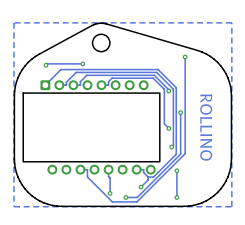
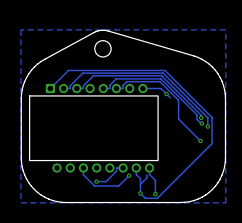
track: (185, 56) (185, 153) (136, 201) (112, 201) (87, 177) (87, 169) (80, 169) -> (129, 175) (118, 185) (94, 185) (83, 174) (83, 167)
via: (185, 56) -> none
track: (82, 63) (46, 65) -> none
via: (82, 63) -> none
via: (46, 65) -> none
track: (60, 69) (158, 69) (176, 87) (176, 154) (153, 177) (148, 177) (143, 172) (143, 169) (136, 169) -> (65, 73) (68, 70) (164, 70) (212, 117) (212, 143) (157, 198) (145, 198) (140, 193) (140, 178) (136, 174) (136, 167)
track: (76, 72) (156, 72) (173, 89) (173, 145) (171, 147) -> (79, 76) (82, 73) (163, 73) (207, 117) (207, 126)
track: (112, 78) (153, 78) (164, 89) (164, 123) (168, 128) -> (113, 81) (116, 78) (161, 78) (197, 114) (197, 119) (201, 123)
track: (80, 82) (86, 75) (154, 75) (168, 90) -> (83, 85) (93, 75) (161, 75) (201, 115) (201, 117)
track: none -> (116, 88) (123, 88) (126, 81) (160, 81) (178, 100) (178, 118) (200, 140)
track: none -> (142, 88) (160, 88) (170, 97)
track: (180, 112) (180, 154) (137, 197) (125, 197) -> none
via: (180, 112) -> none
via: none -> (201, 117)
via: none -> (201, 123)
via: none -> (207, 126)
text: ROLLINO (206, 127) -> none
via: (168, 128) -> none
via: none -> (200, 140)
via: (171, 147) -> none
track: (108, 169) (110, 193) -> none
track: none -> (123, 167) (116, 167) (116, 171) (106, 181) (96, 181)
track: none -> (149, 167) (149, 174) (155, 180) (155, 194)
track: (176, 170) (176, 197) -> none
via: (176, 170) -> none
via: none -> (129, 175)
via: none -> (96, 181)
via: (141, 187) -> none
via: (110, 193) -> none
via: none -> (140, 193)
via: (125, 197) -> none
via: none -> (155, 194)
via: (176, 197) -> none

